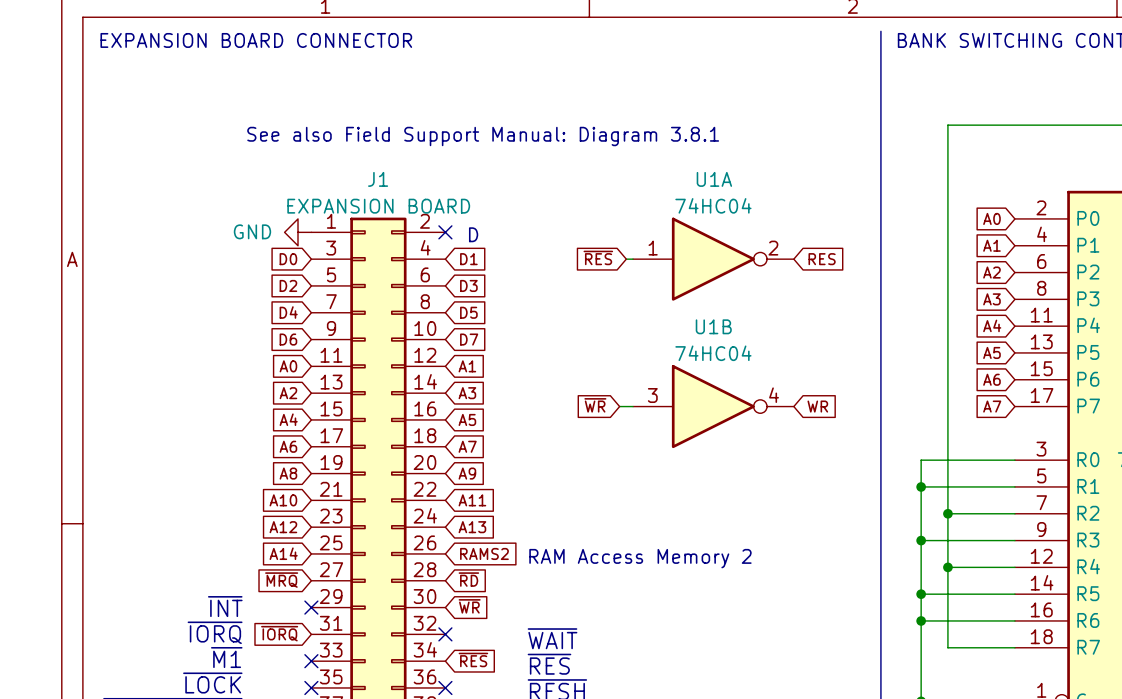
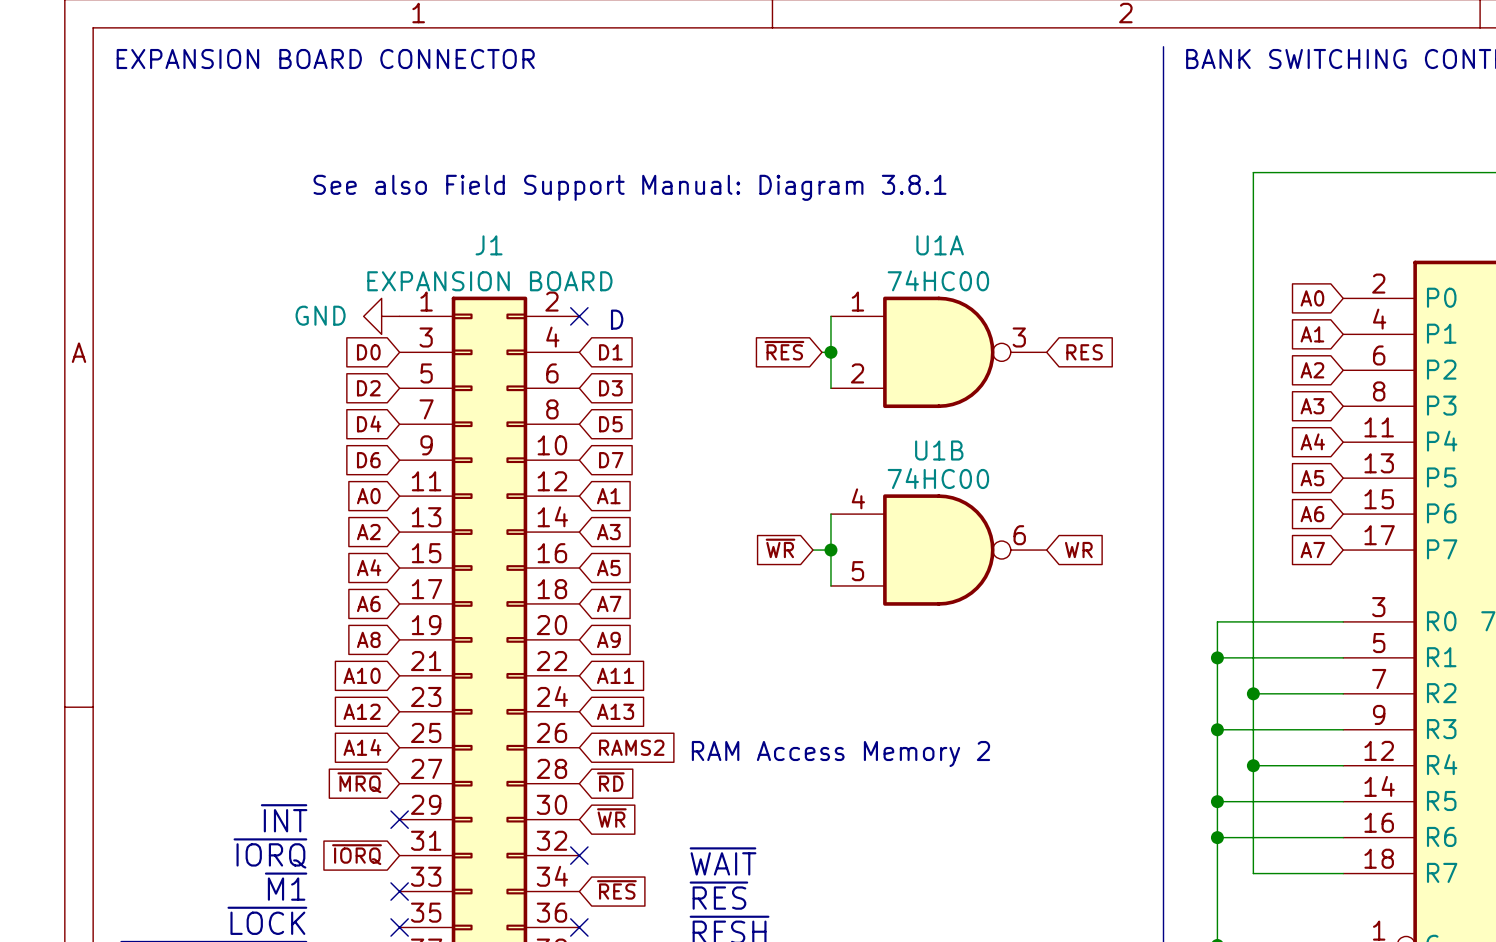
U1A value: 74HC04 (713, 205) -> 74HC00 (938, 280)
U1A symbol: [633, 217, 794, 301] -> [830, 296, 1047, 409]
wire: none -> (830, 316) (830, 388)
junction: none -> (830, 352)
U1B value: 74HC04 (713, 353) -> 74HC00 (938, 478)
U1B symbol: [633, 365, 794, 449] -> [830, 494, 1047, 606]
wire: none -> (830, 514) (830, 585)
junction: none -> (830, 550)

